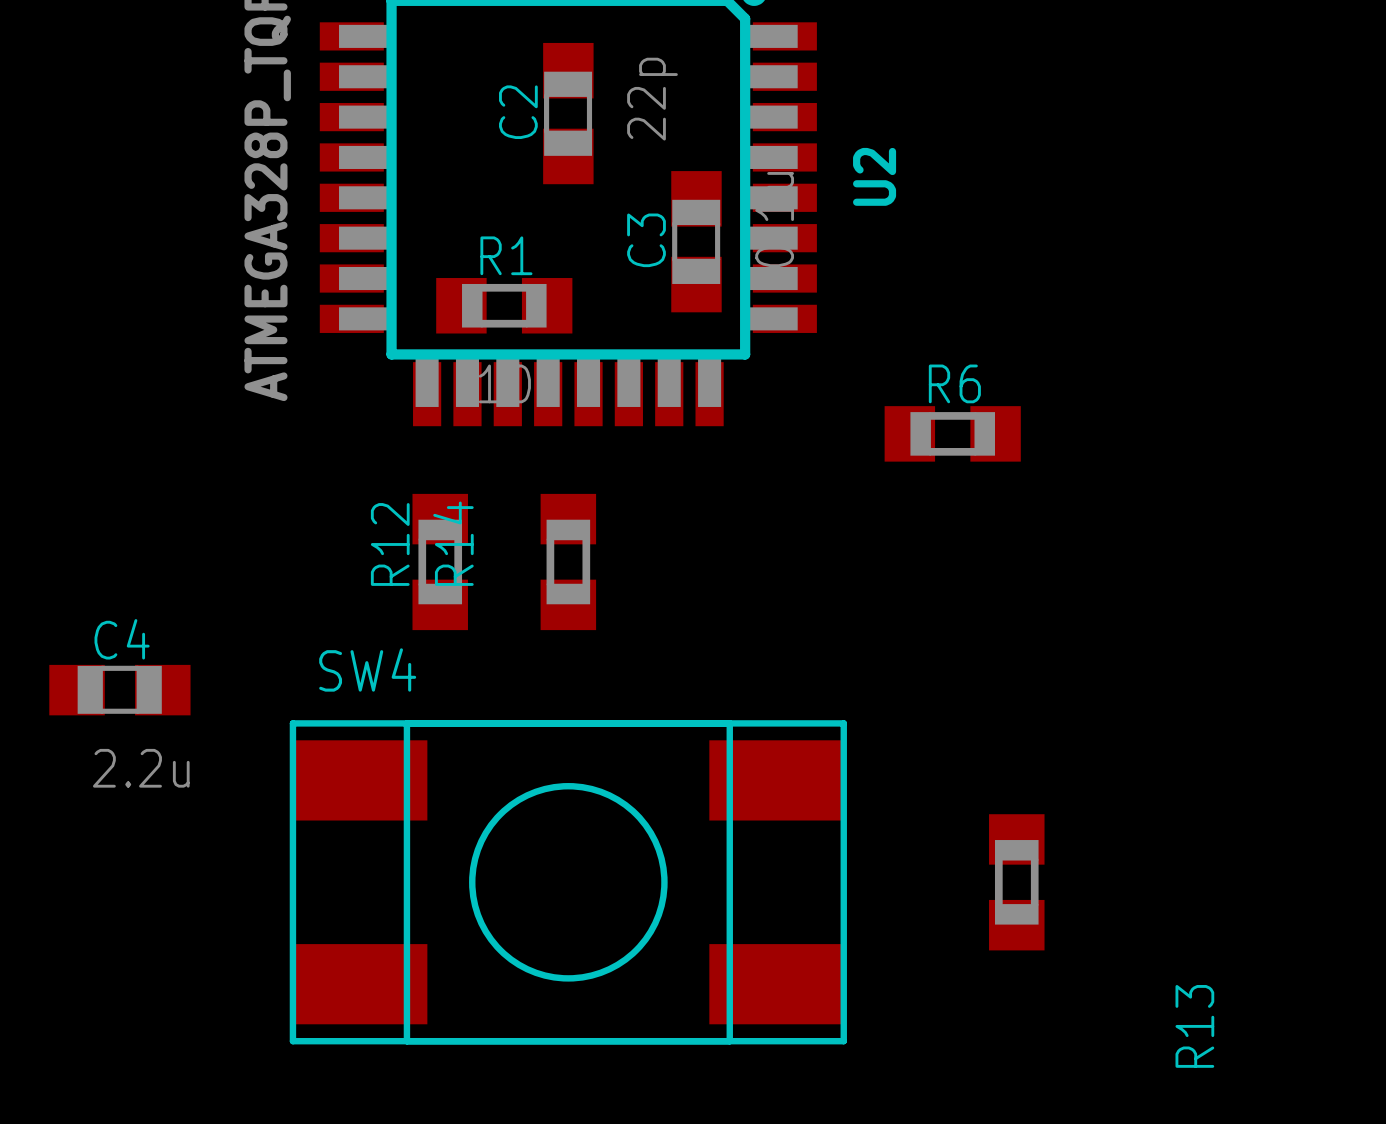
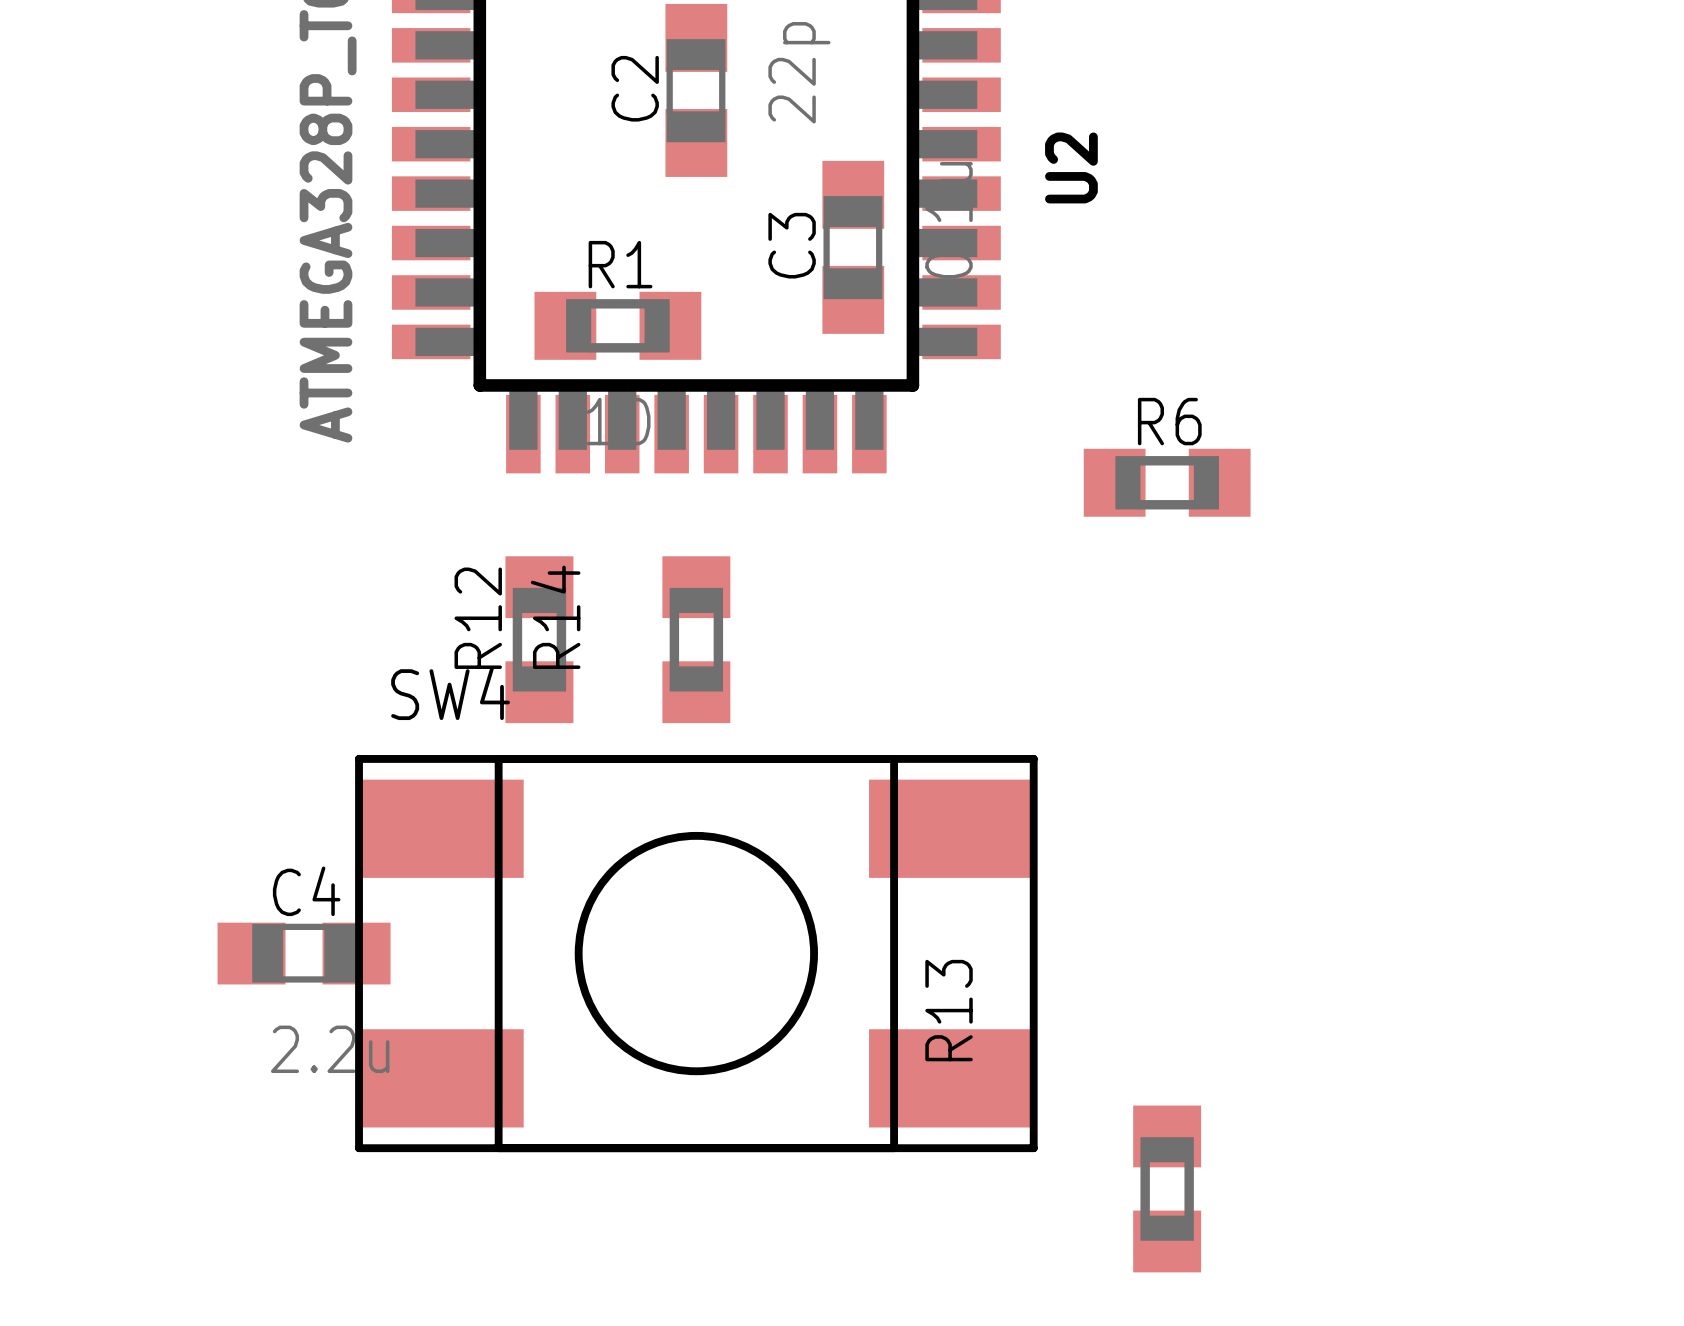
C4 position: (119, 690) -> (304, 953)
SW4 position: (568, 882) -> (696, 953)
R13 position: (1016, 882) -> (1167, 1188)
R13 name position: R13 (1194, 1026) -> R13 (949, 1010)

